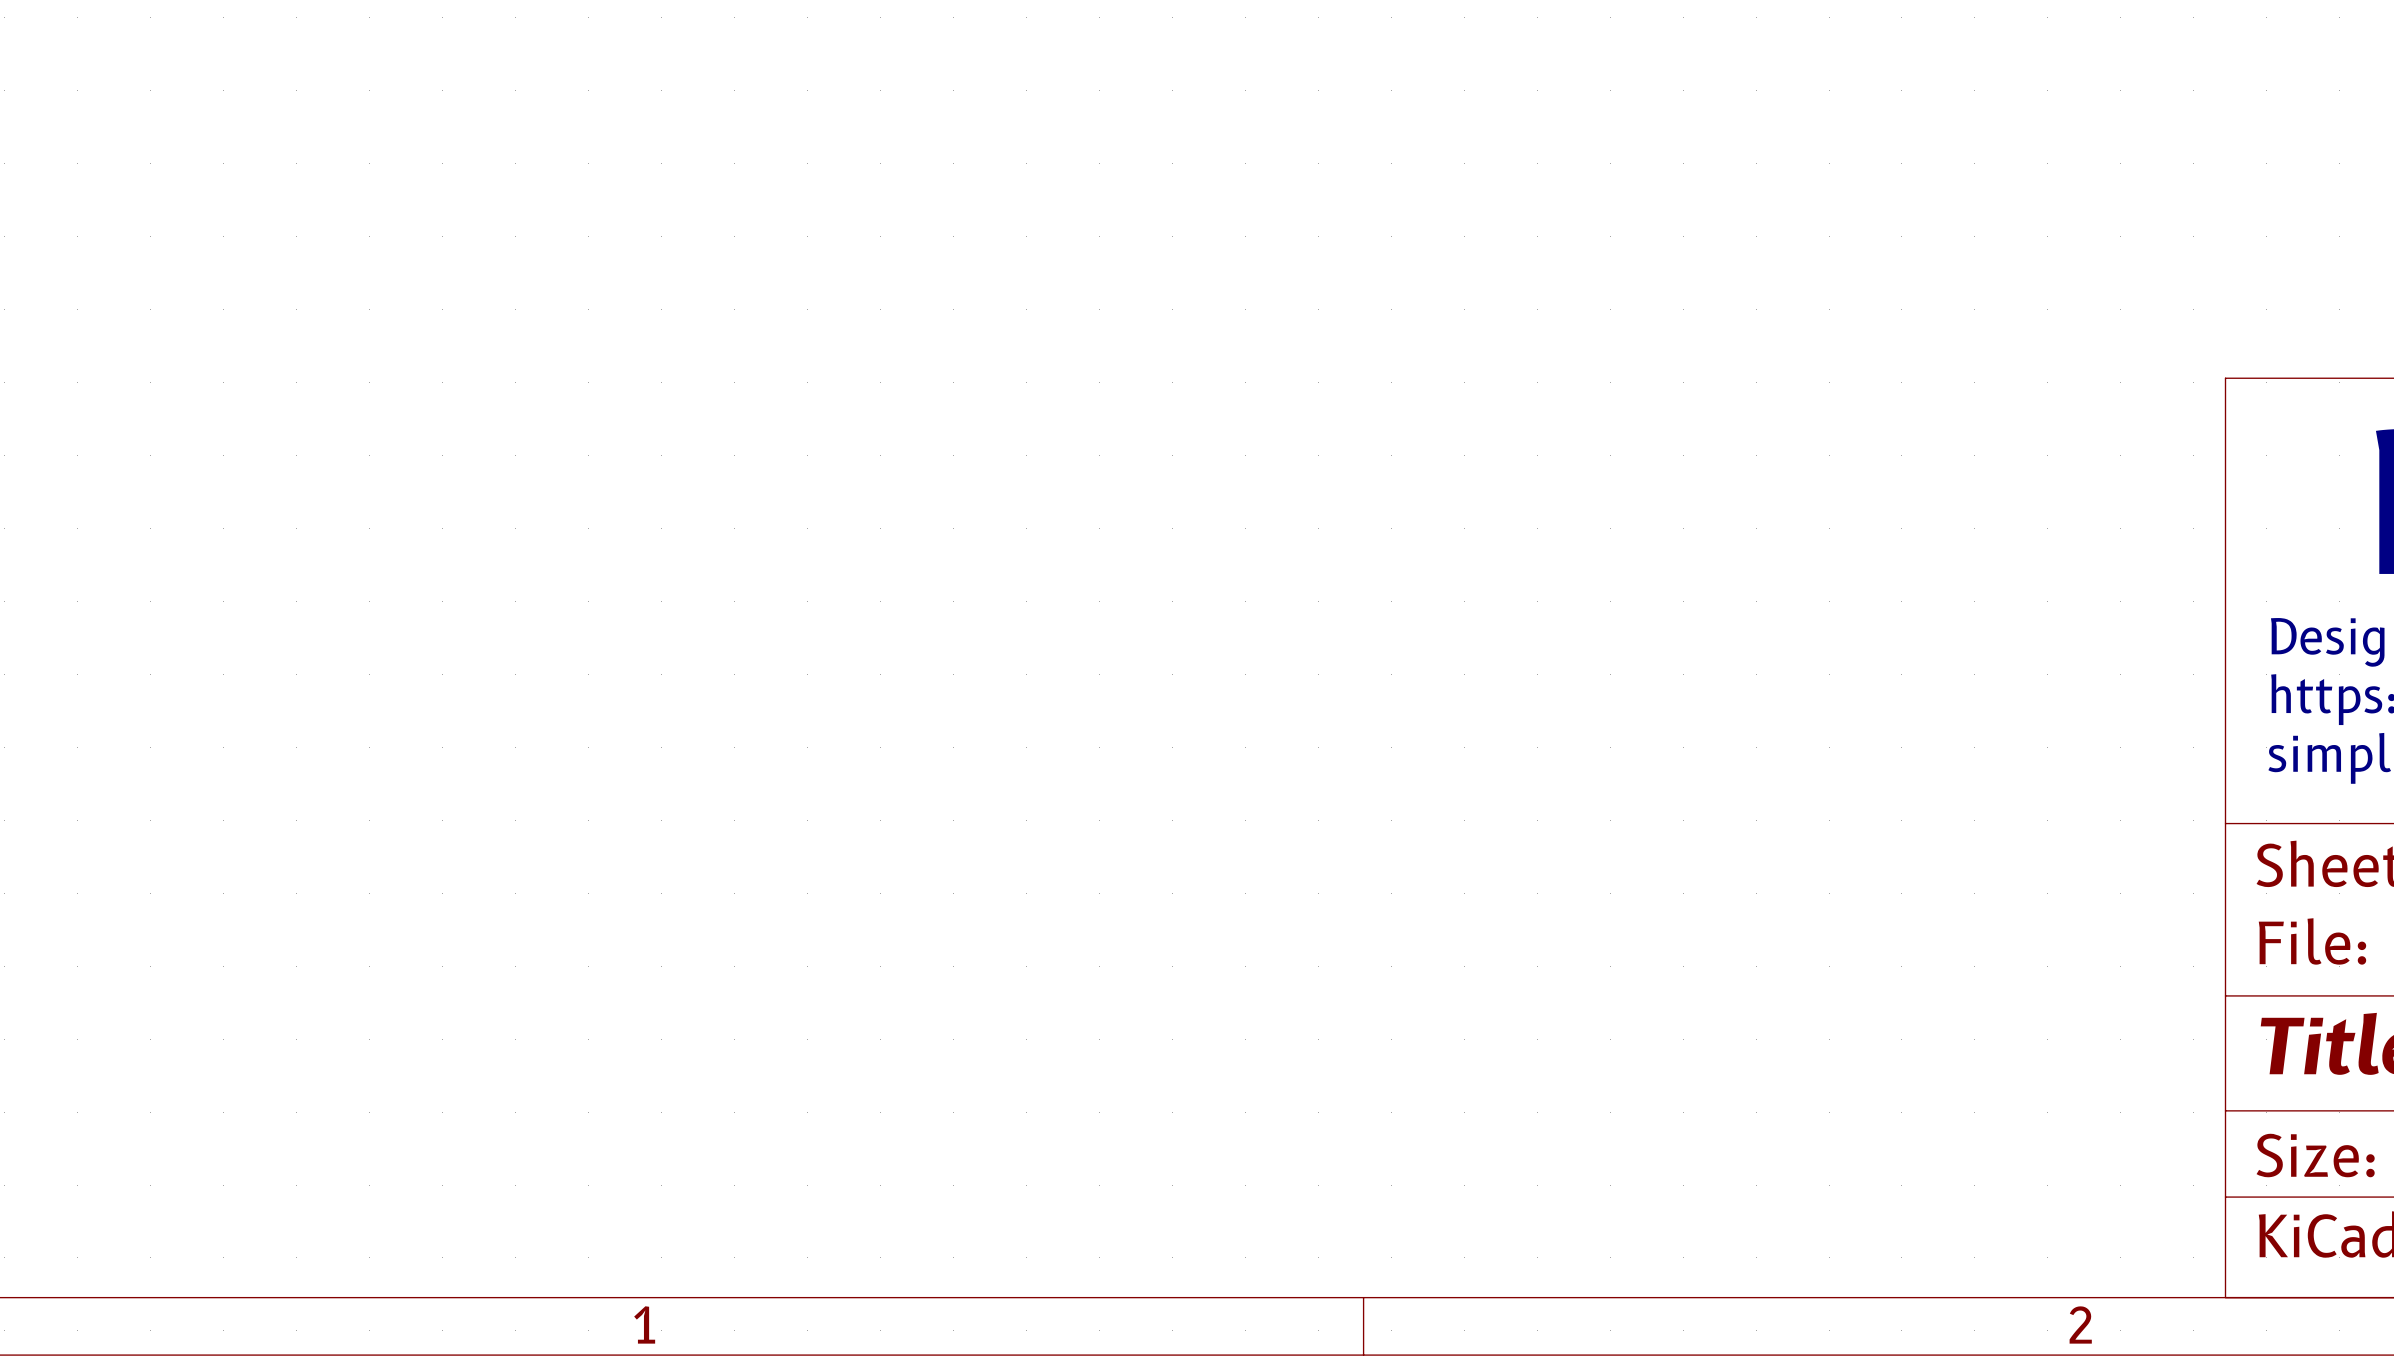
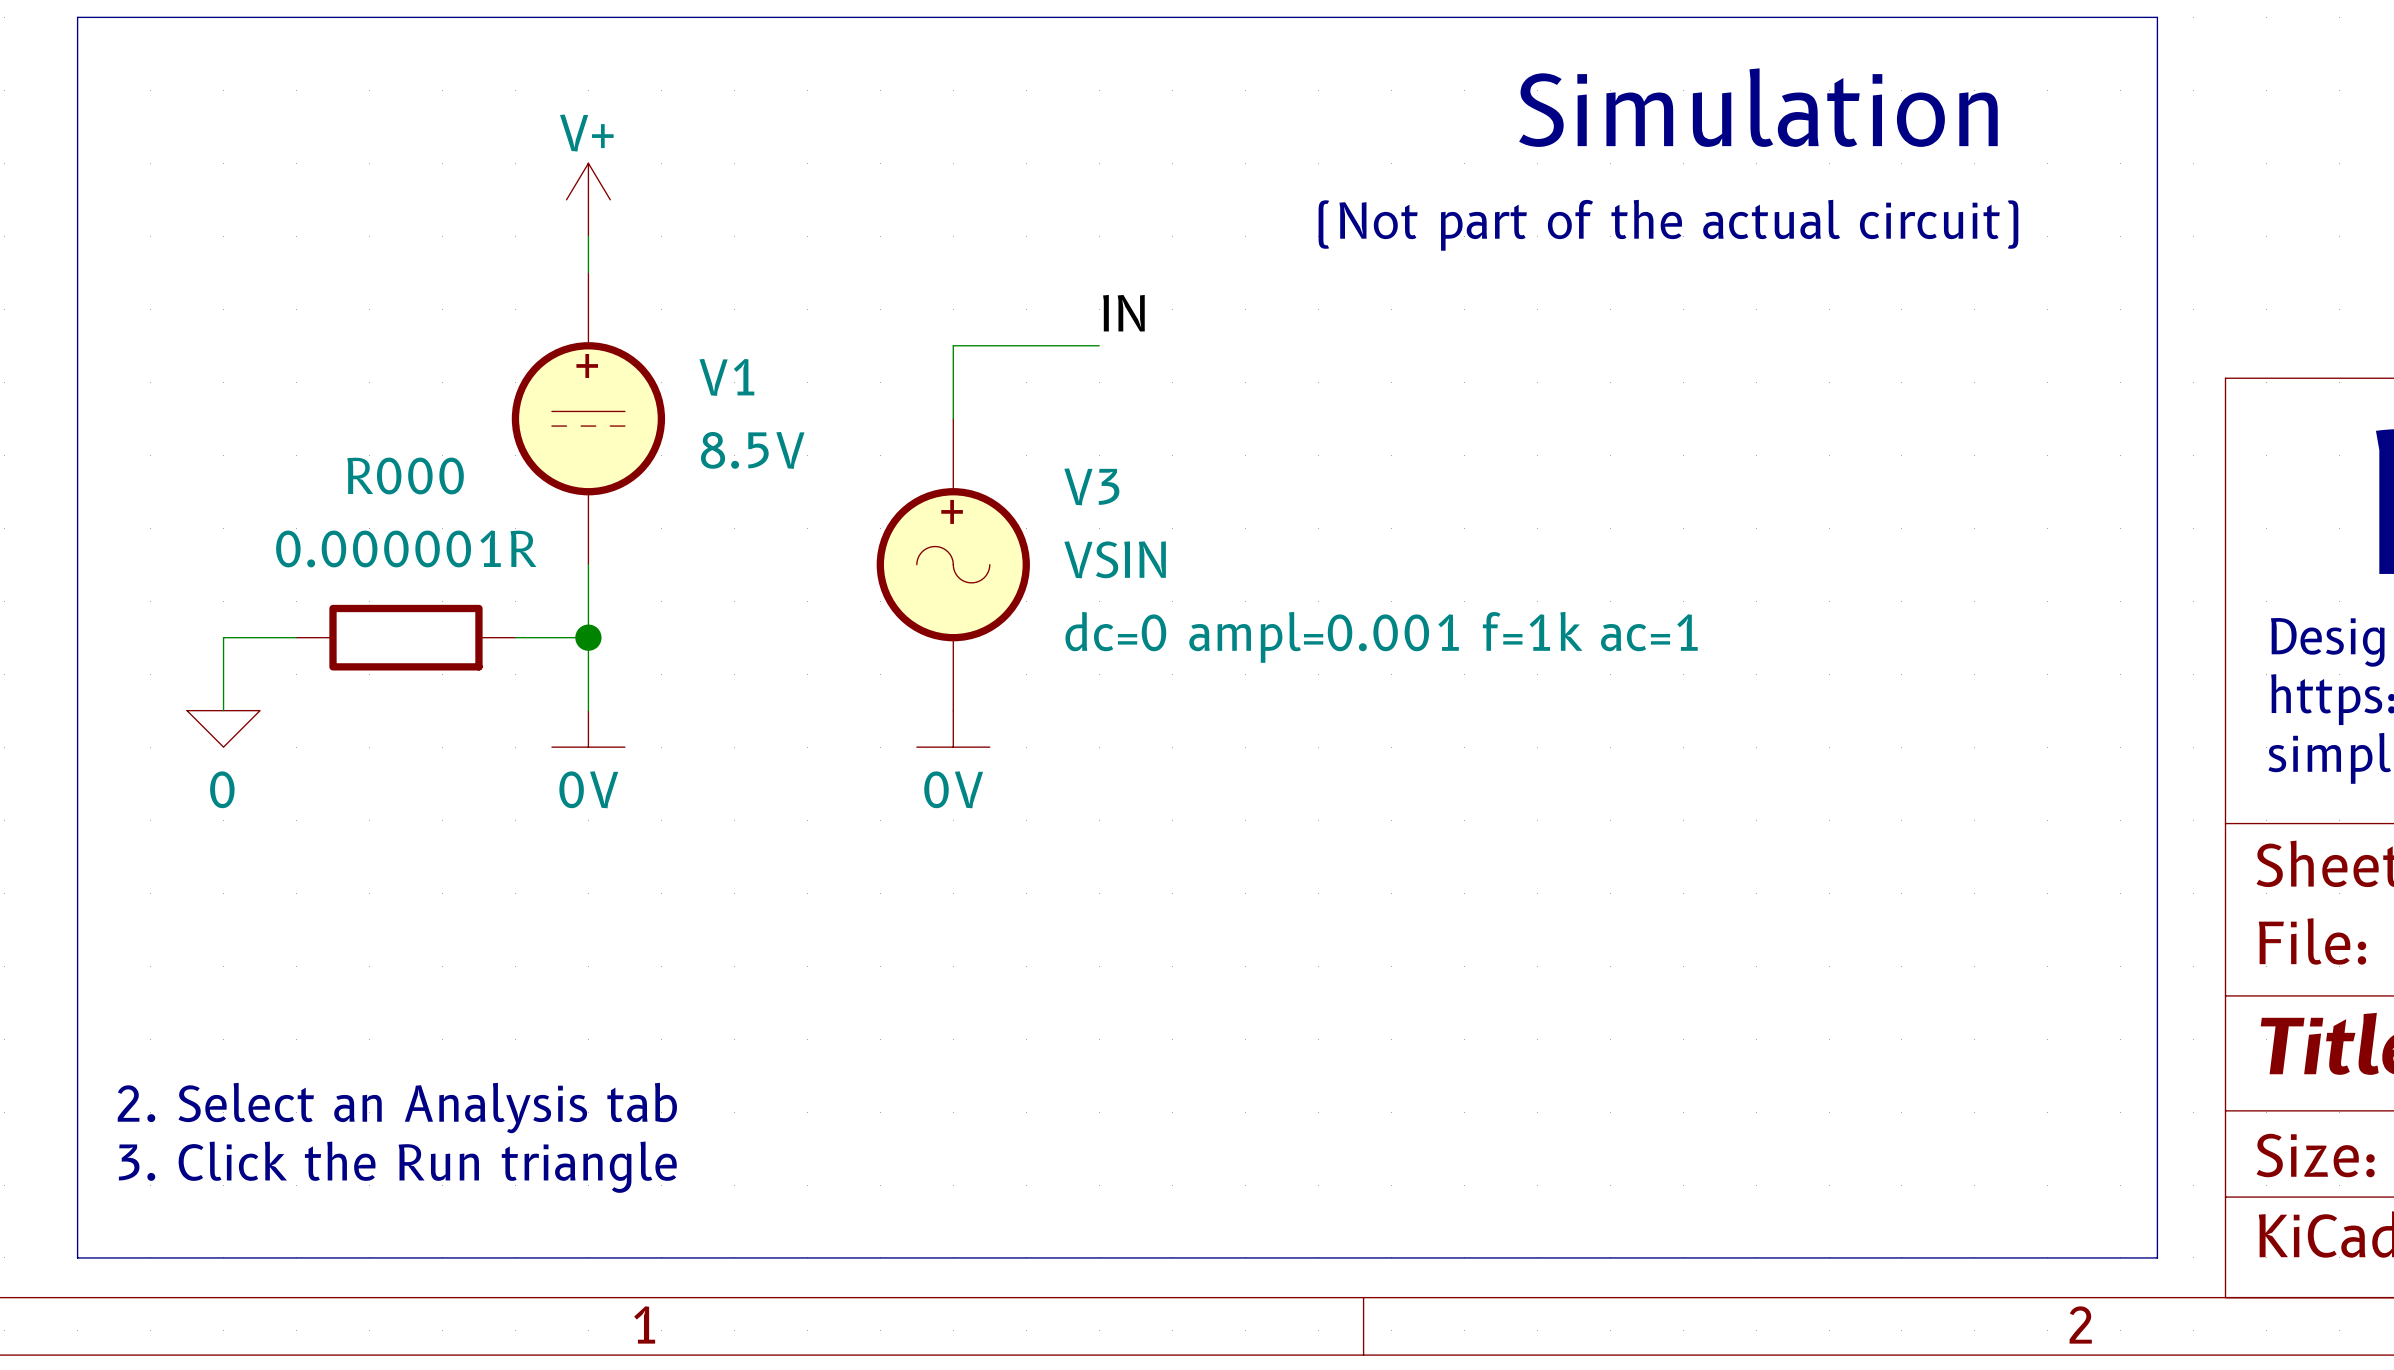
line: none -> (77, 17) (2157, 17) (2157, 1257) (77, 1257) (77, 17)
text: none -> Simulation (1758, 107)
power symbol: none -> V+ (588, 199)
text: none -> (Not part of the actual circuit) (1668, 225)
wire: none -> (588, 236) (588, 272)
label: none -> IN (1123, 313)
wire: none -> (1099, 345) (953, 345) (953, 418)
V1: none -> 8.5V (588, 418)
wire: none -> (588, 564) (588, 710)
V3: none -> VSIN (953, 564)
wire: none -> (296, 637) (223, 637) (223, 710)
R000: none -> 0.000001R (405, 637)
wire: none -> (515, 637) (588, 637)
junction: none -> (588, 637)
power symbol: none -> 0 (223, 728)
power symbol: none -> 0V (588, 728)
power symbol: none -> 0V (953, 728)
text: none -> 2. Select an Analysis tab (397, 1108)
text: none -> 3. Click the Run triangle (397, 1167)

